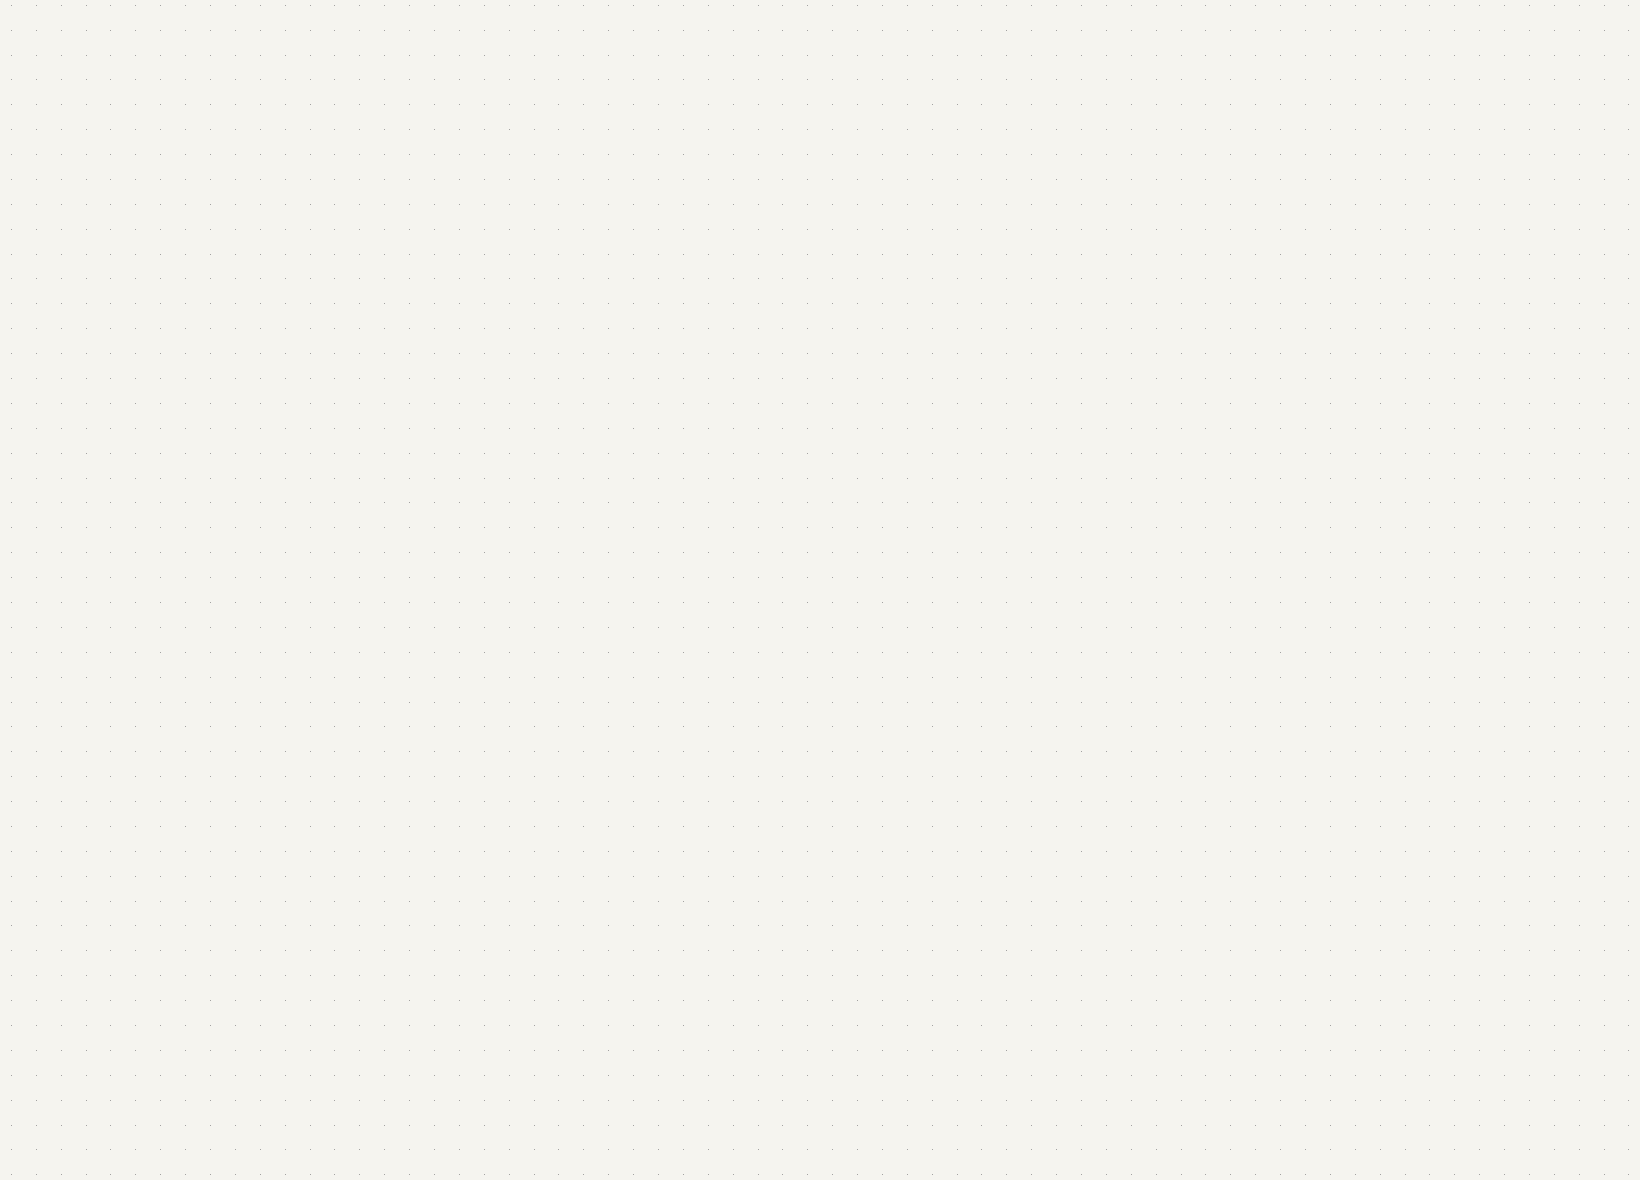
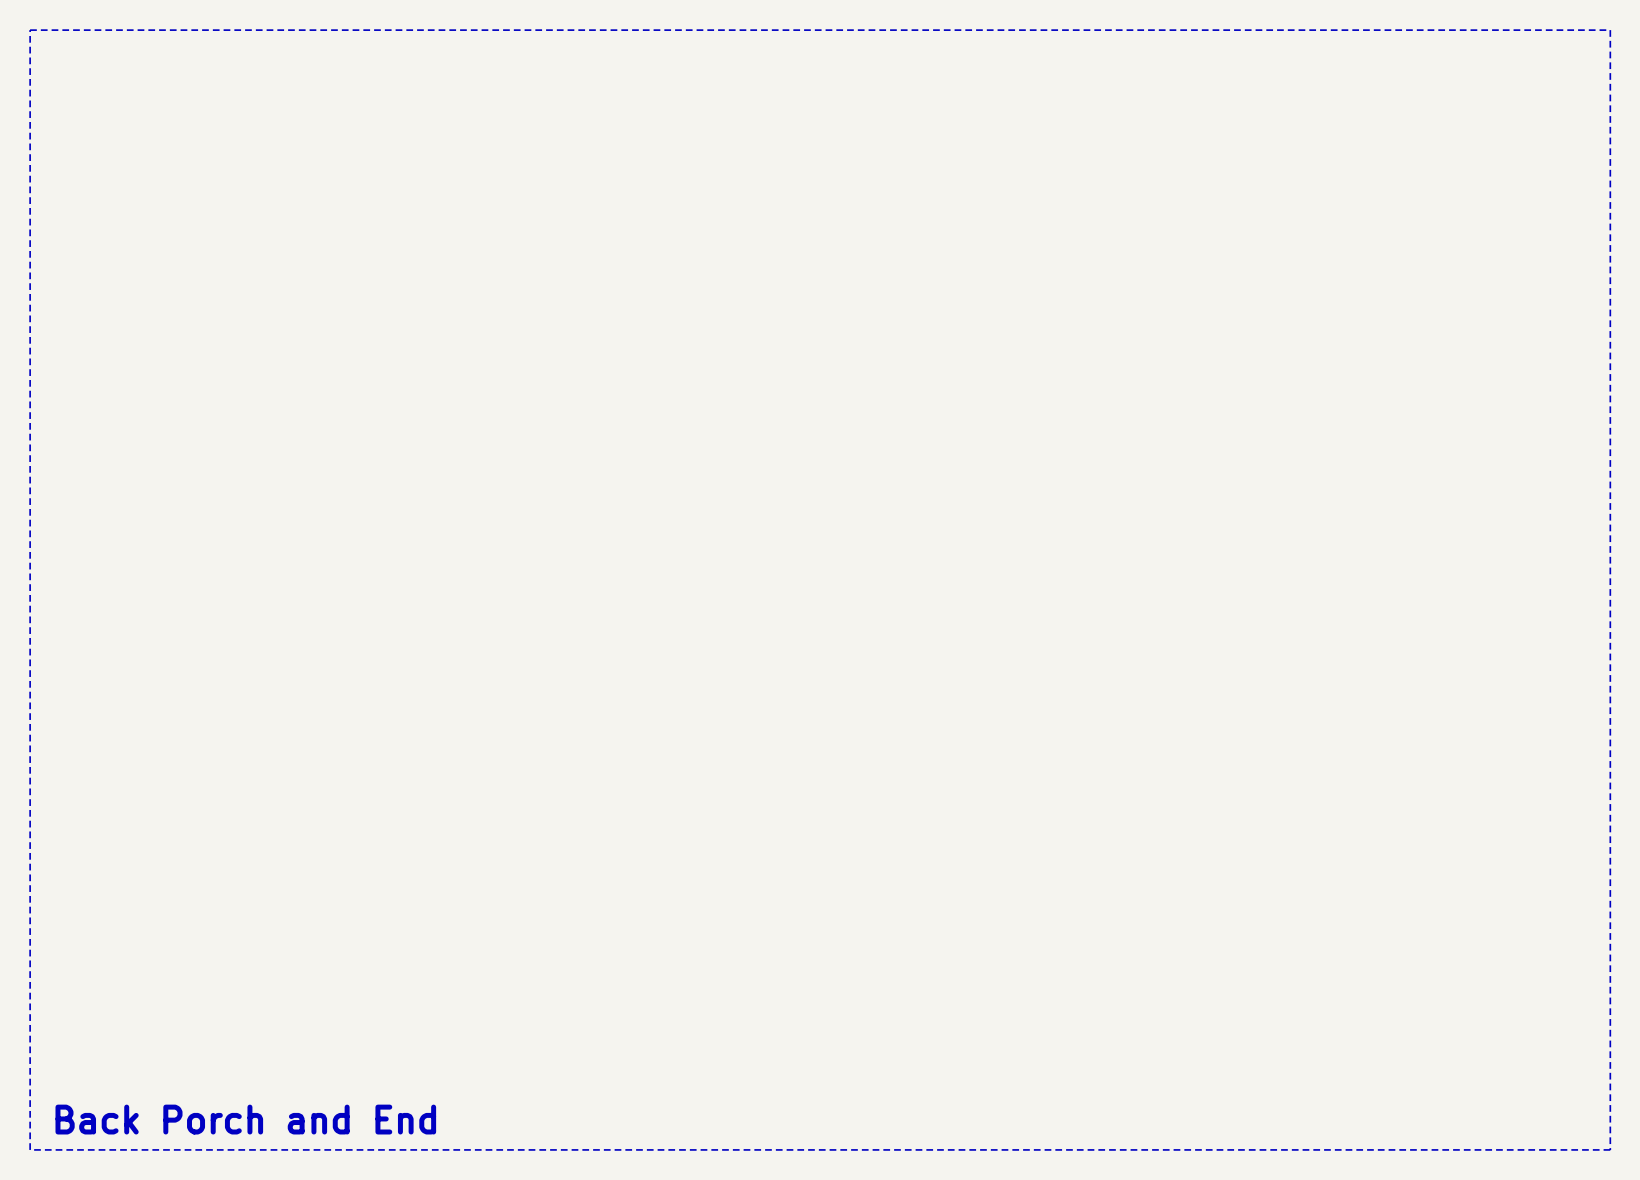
line: none -> (30, 30) (1610, 30) (1610, 1149) (30, 1149) (30, 30)
text: none -> Back Porch and End (245, 1119)

